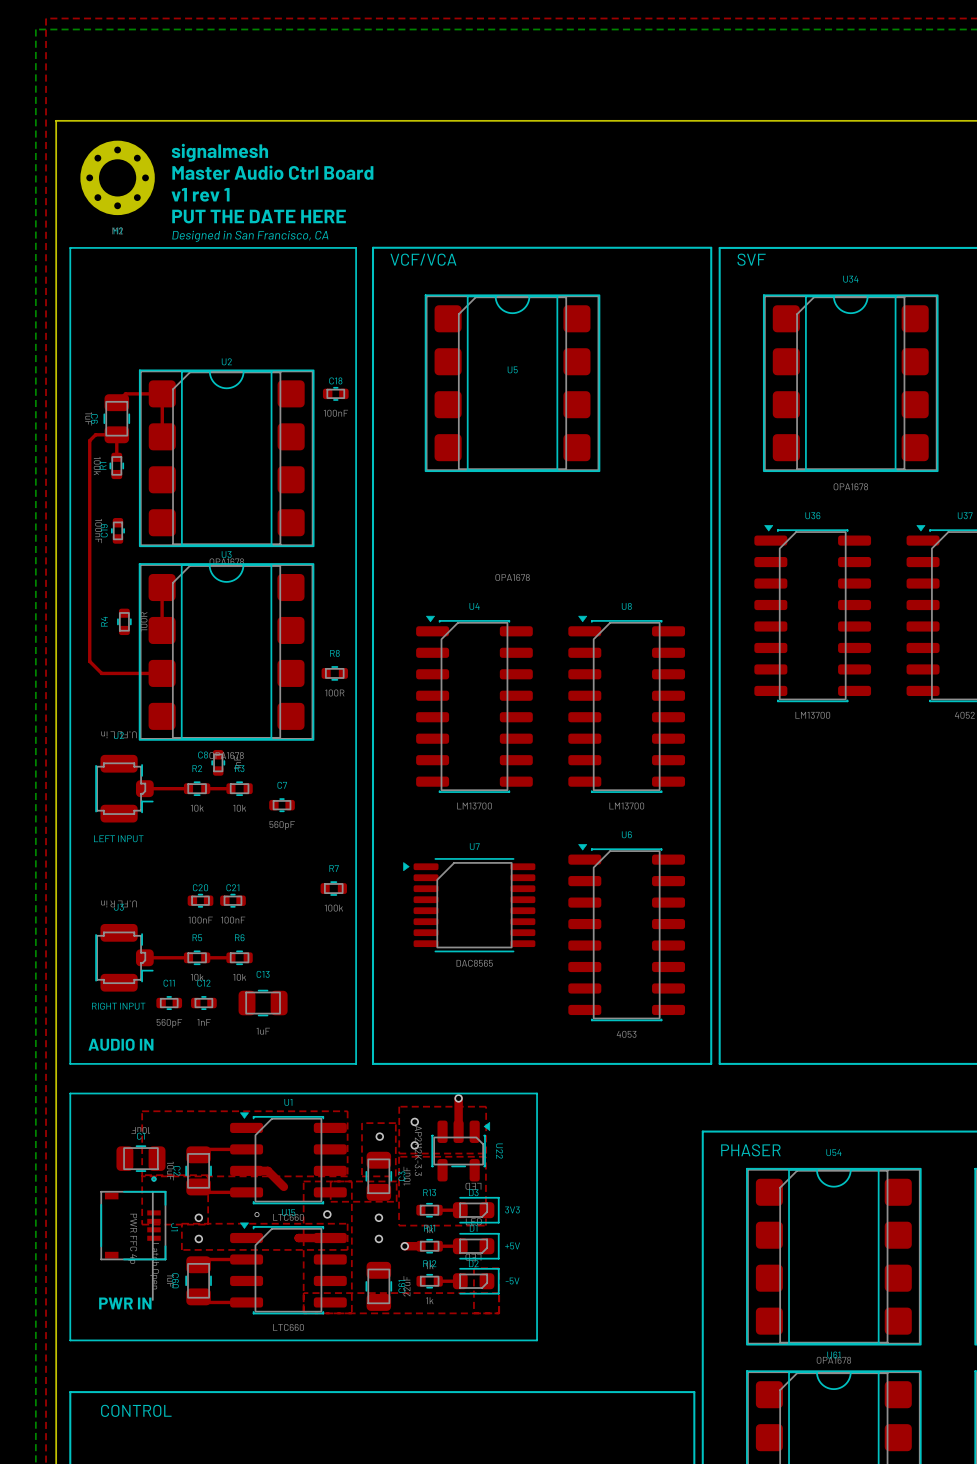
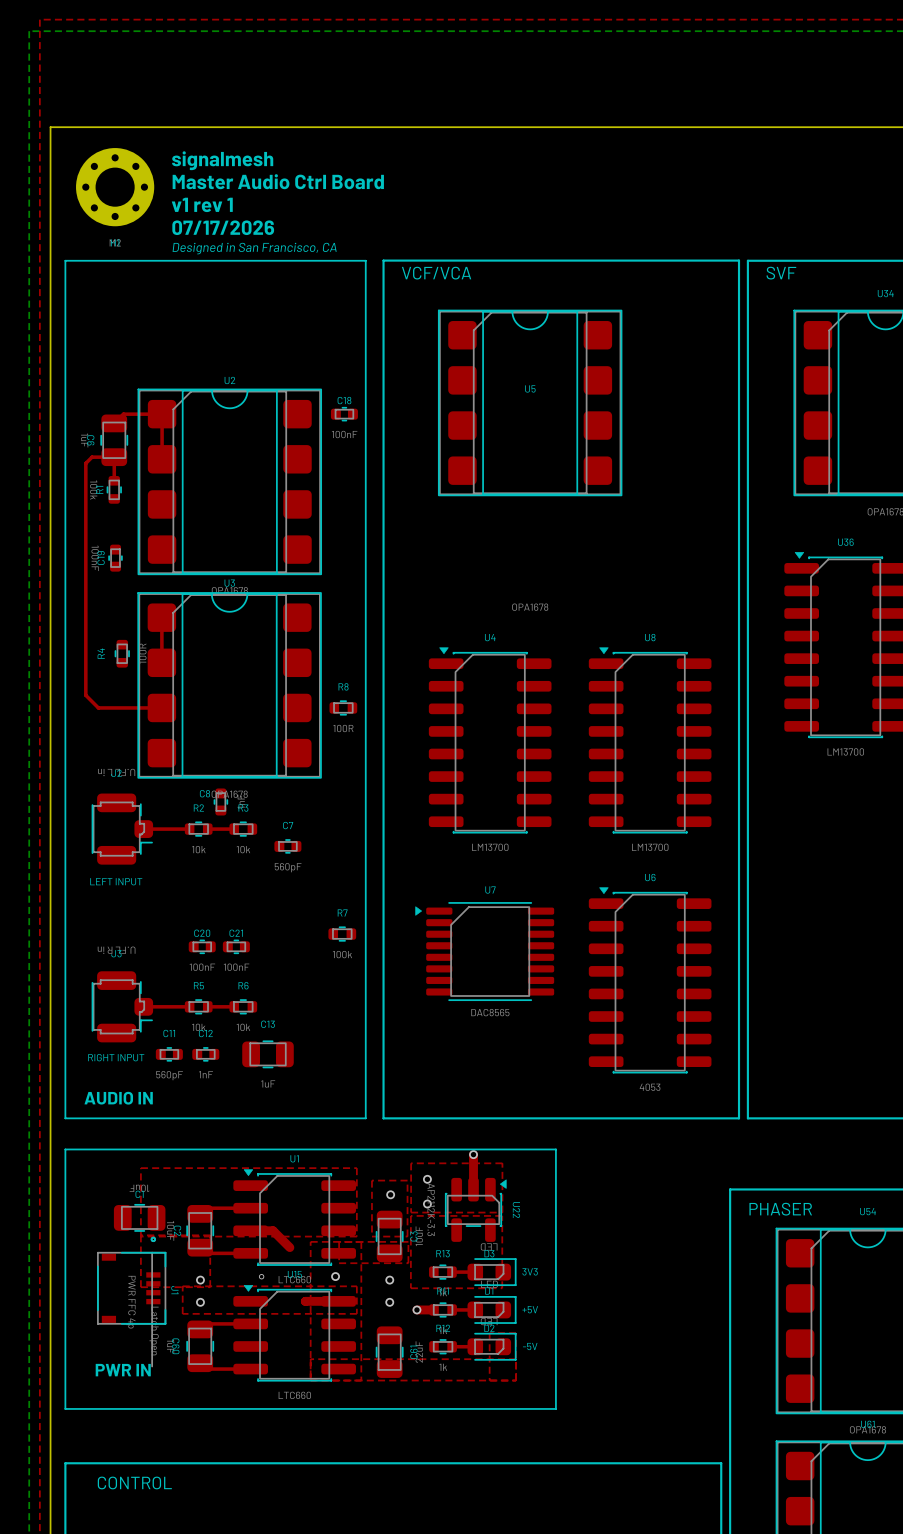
text: PUT THE DATE HERE (259, 216) -> 07/17/2026 (223, 227)

